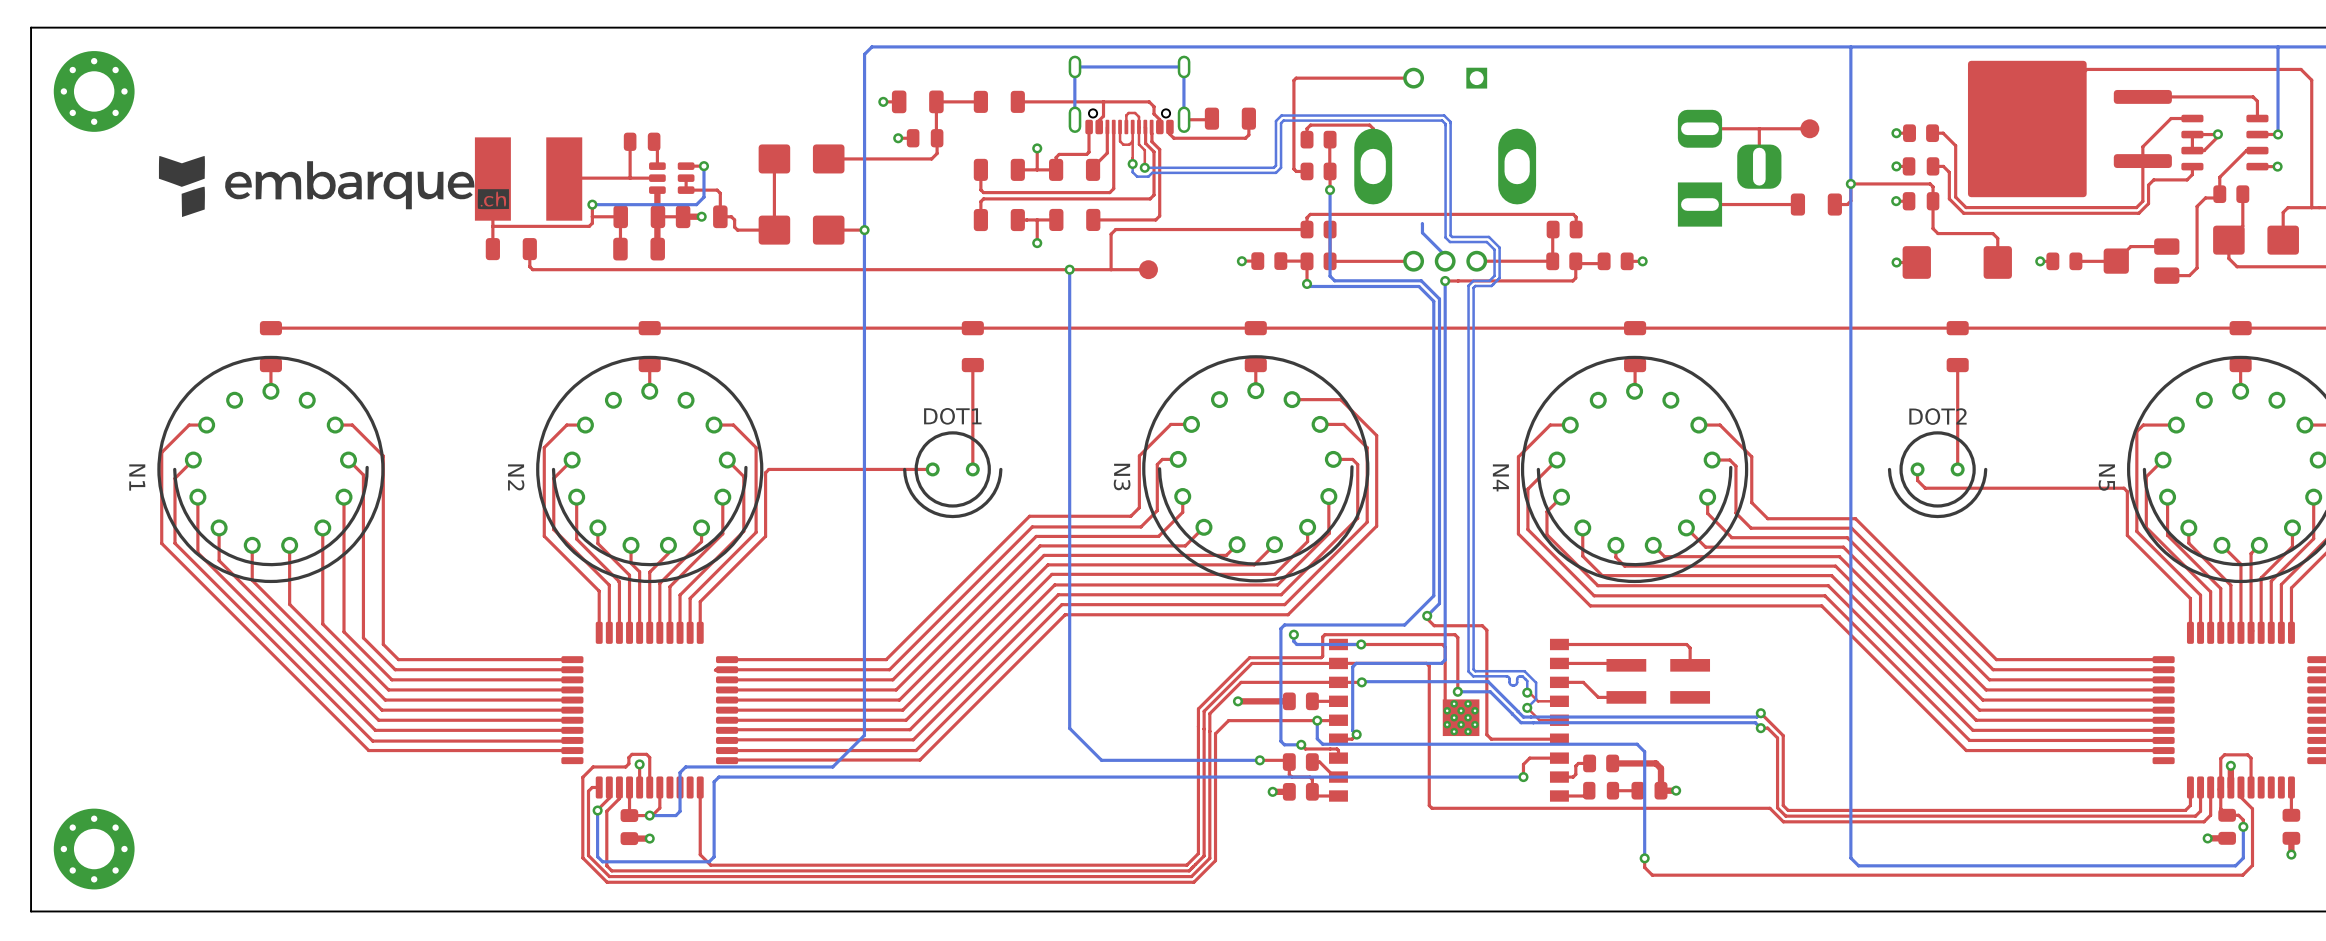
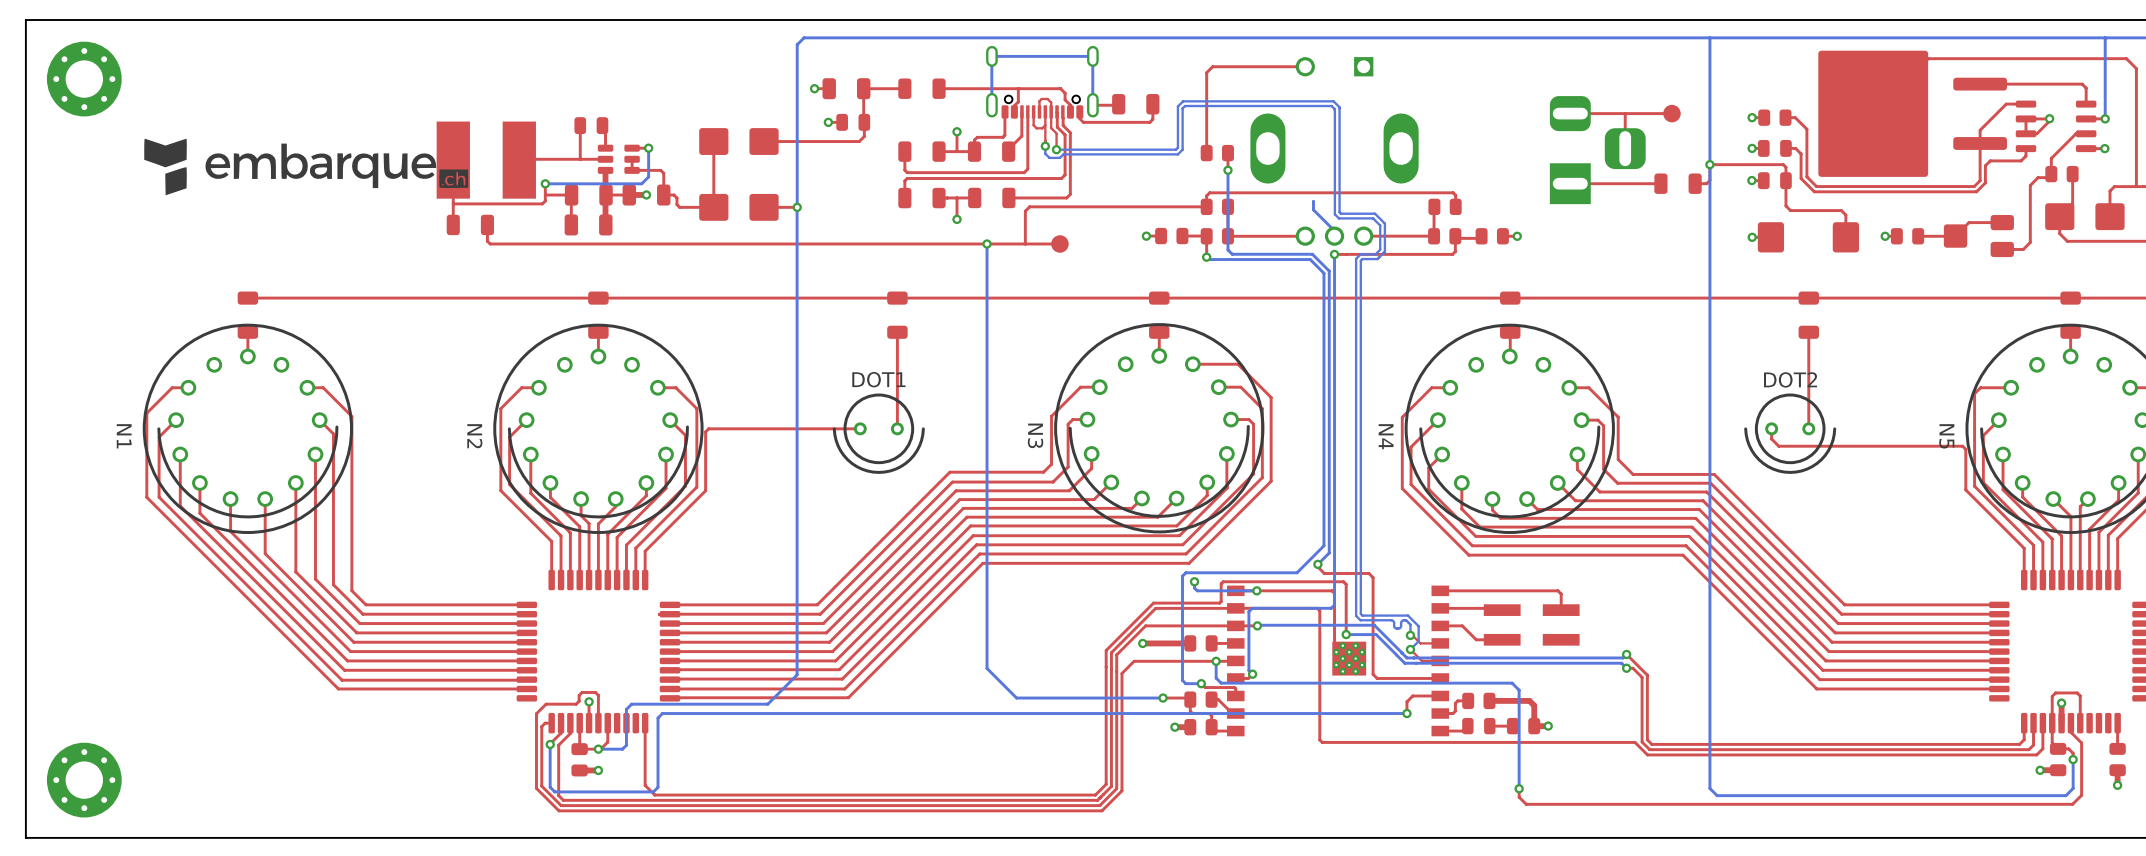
top track: (1313, 78) (1296, 78) (1293, 80) (1293, 169) (1296, 171) (1307, 171) -> (1212, 66) (1206, 72) (1206, 113)
top track: (1307, 128) (1310, 125) (1369, 125) (1373, 128) (1373, 166) -> none
top track: none -> (1206, 123) (1206, 153)
part: (1318, 139) -> none
top track: (1329, 139) (1330, 171) -> none

